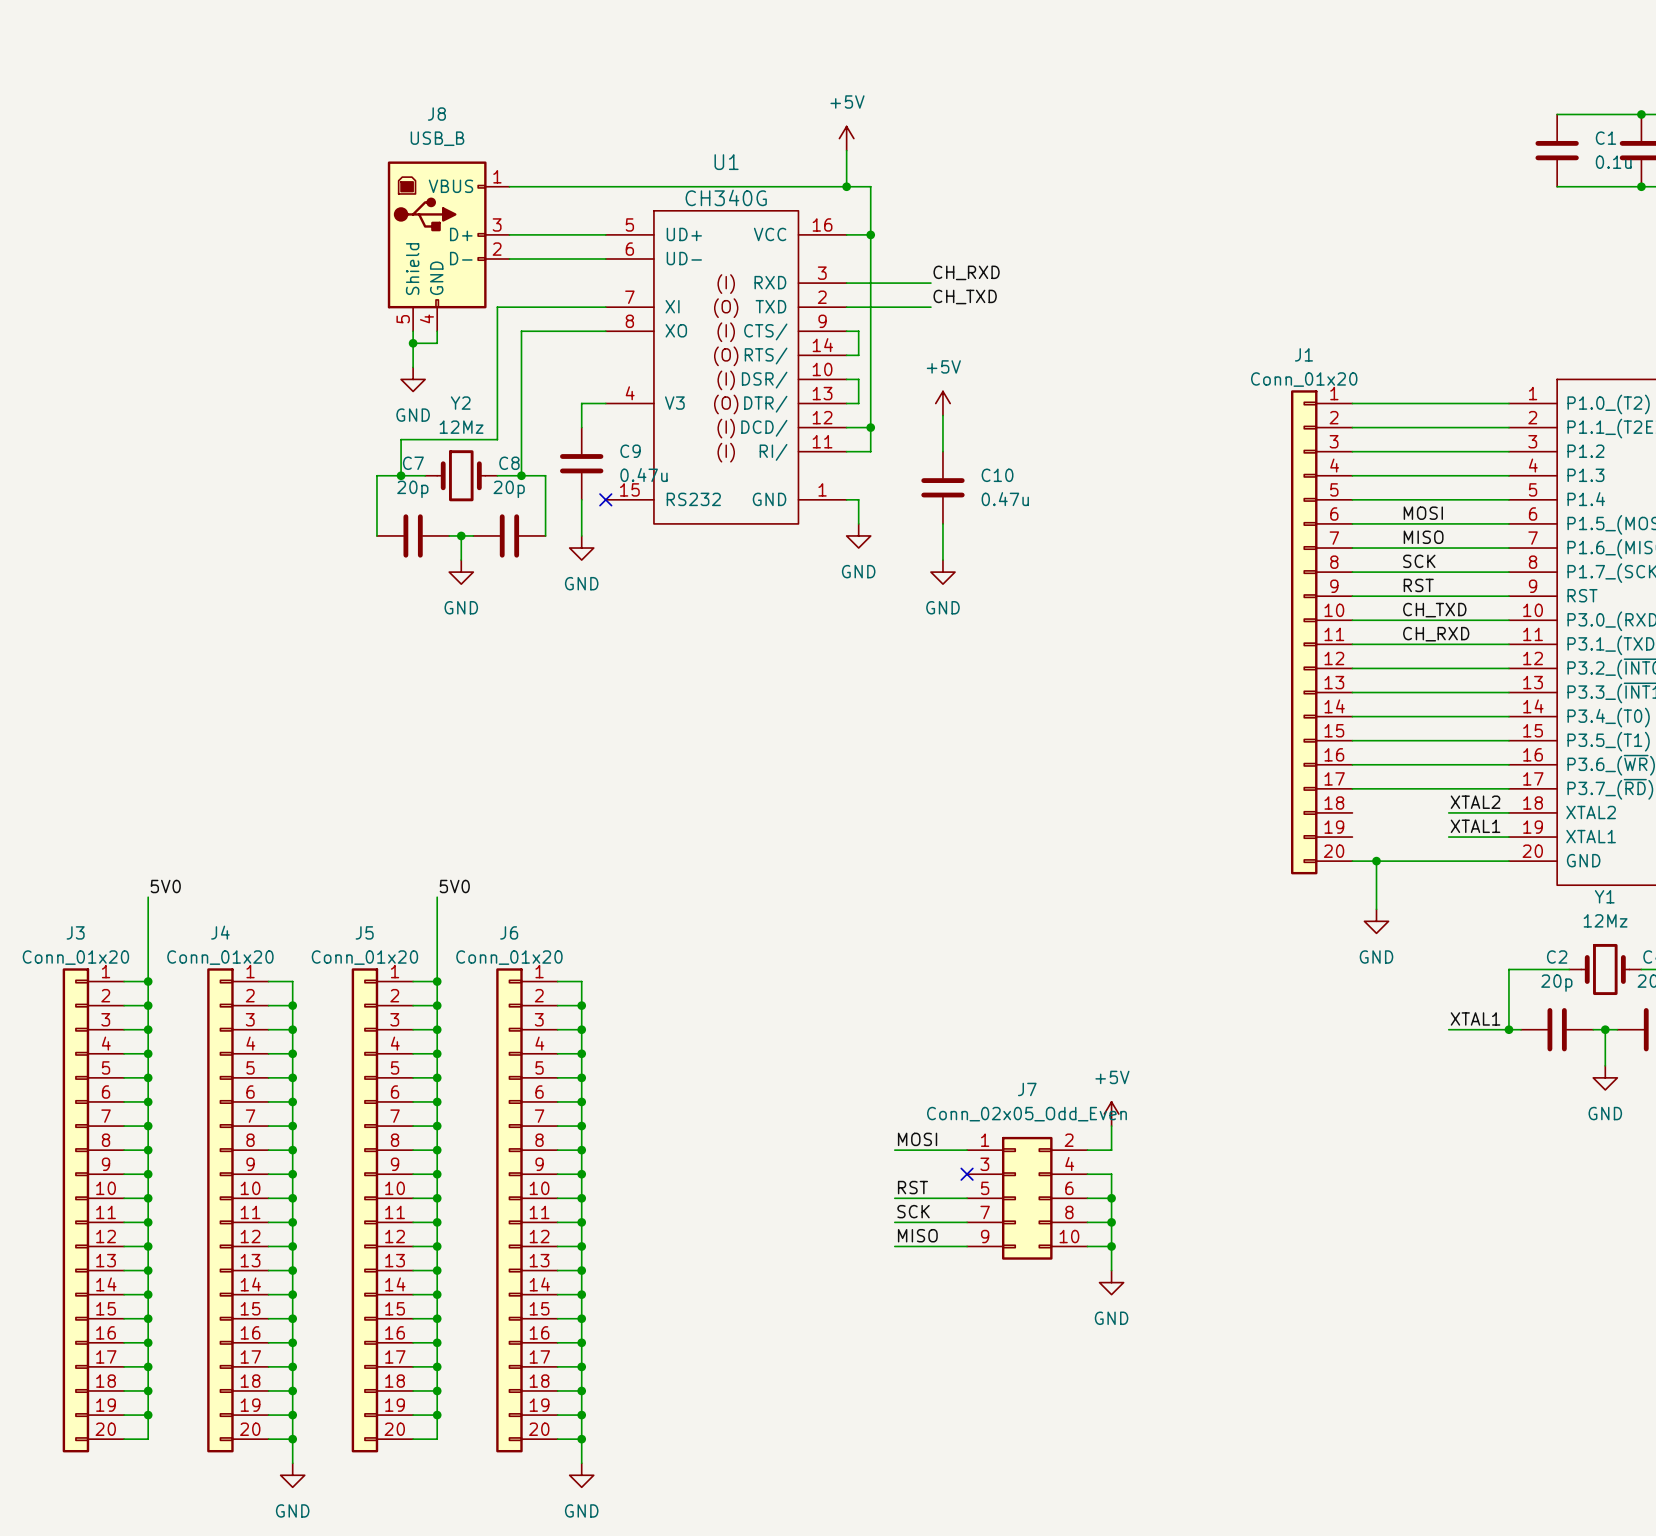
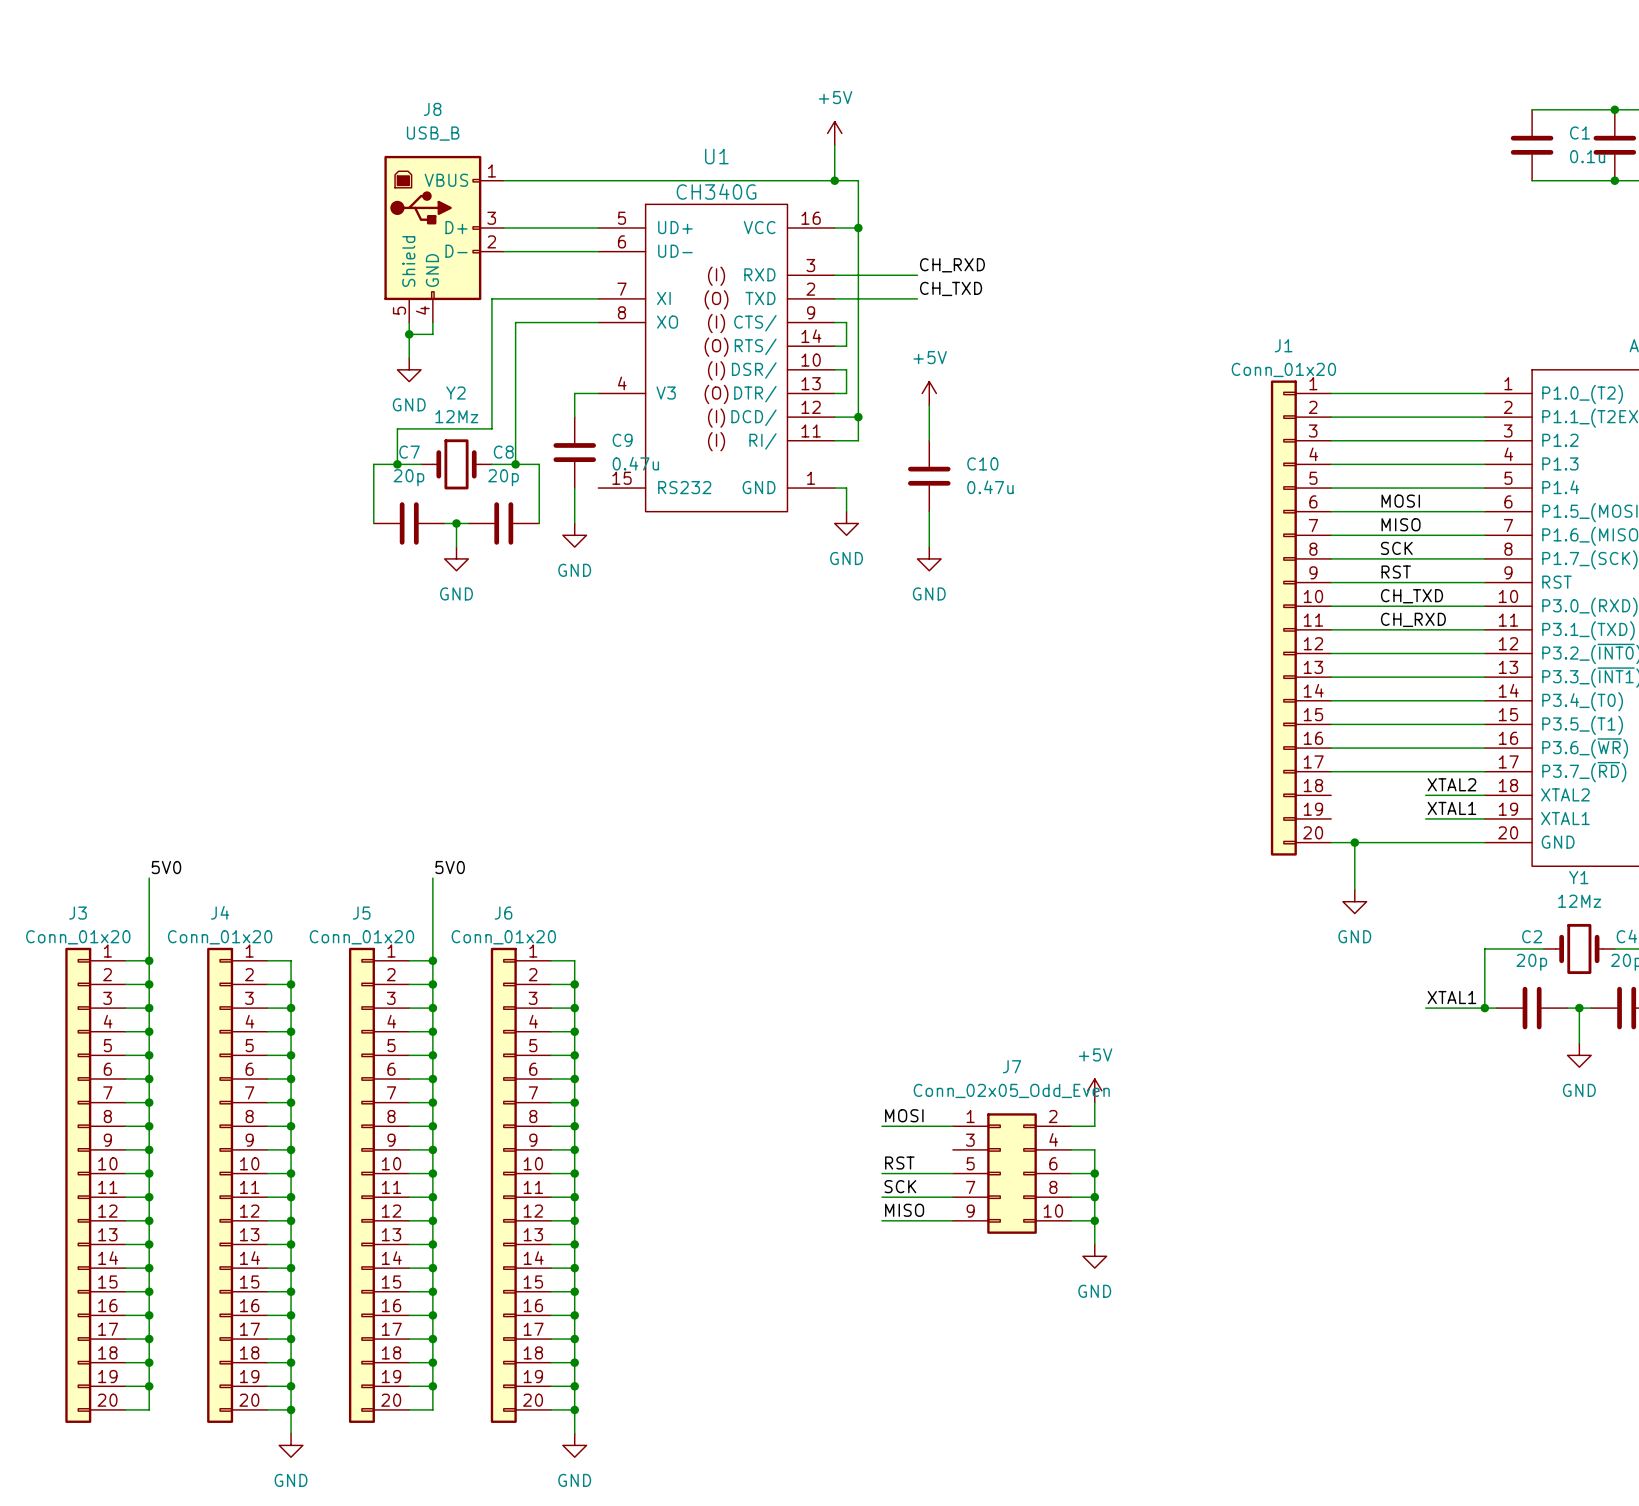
no-connect mark: (605, 499) -> none
no-connect mark: (967, 1174) -> none

